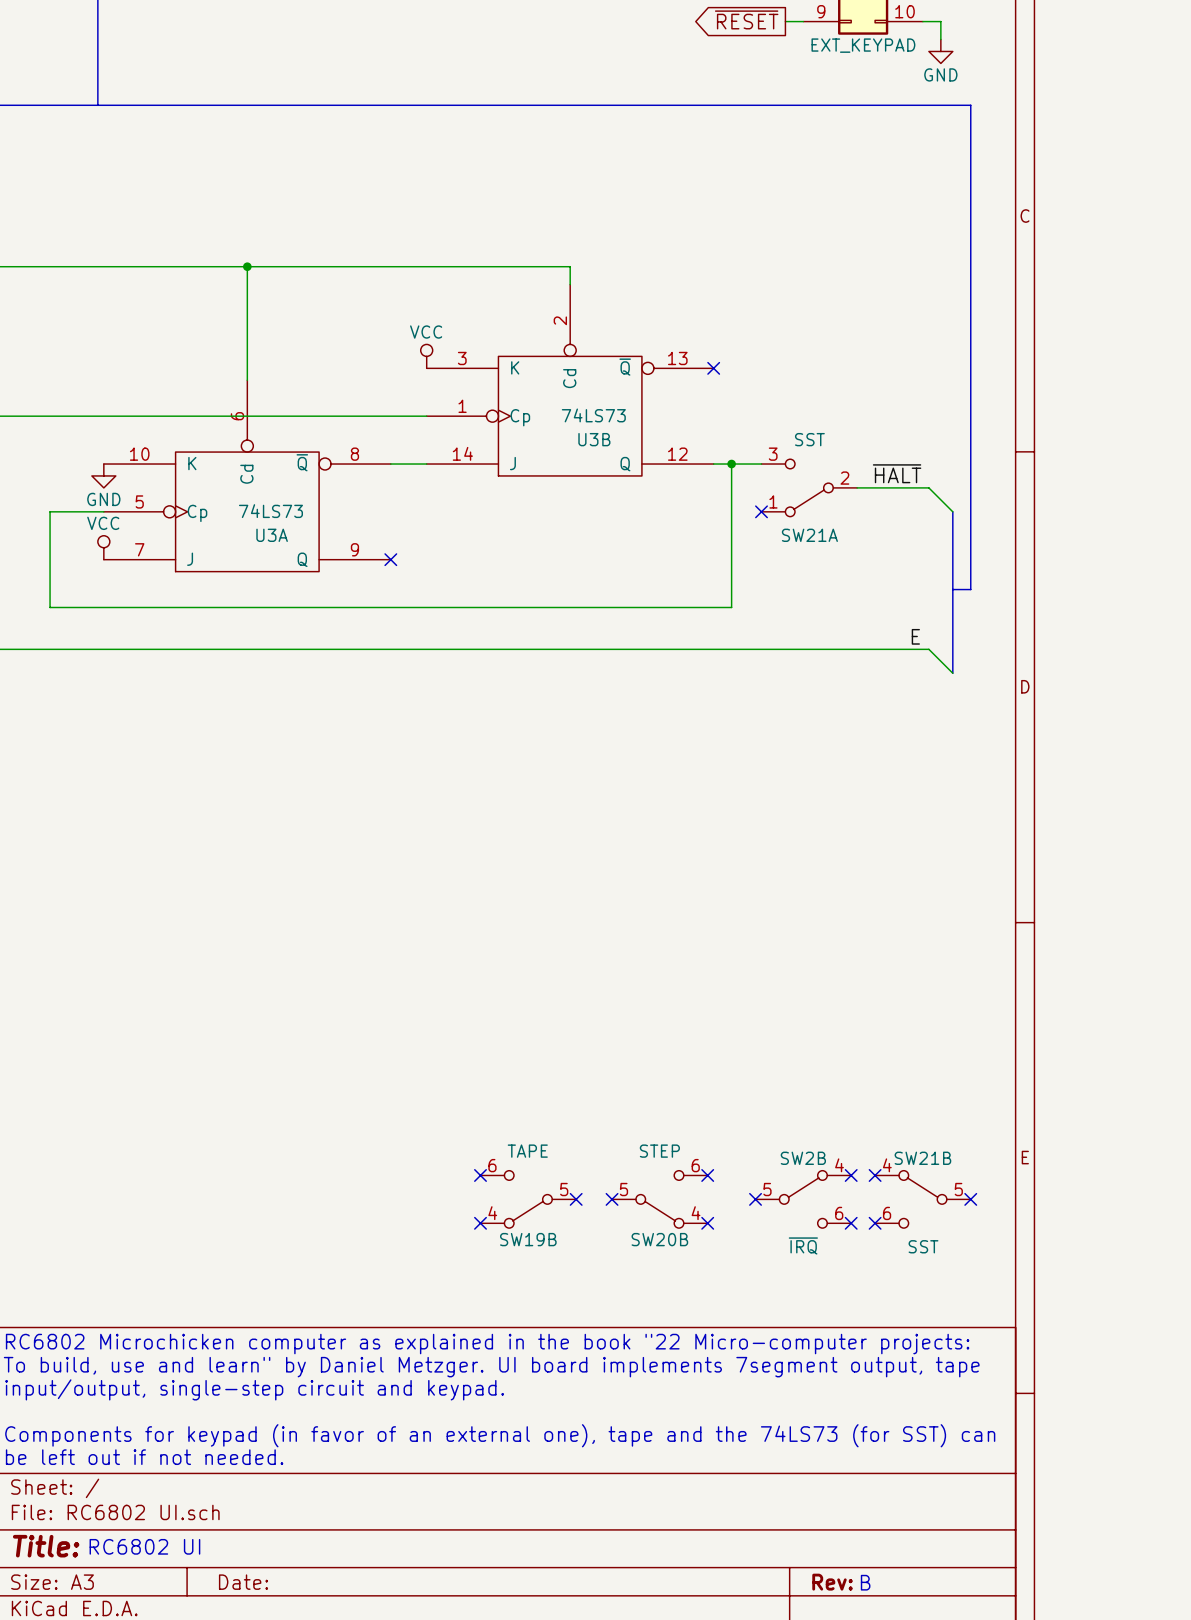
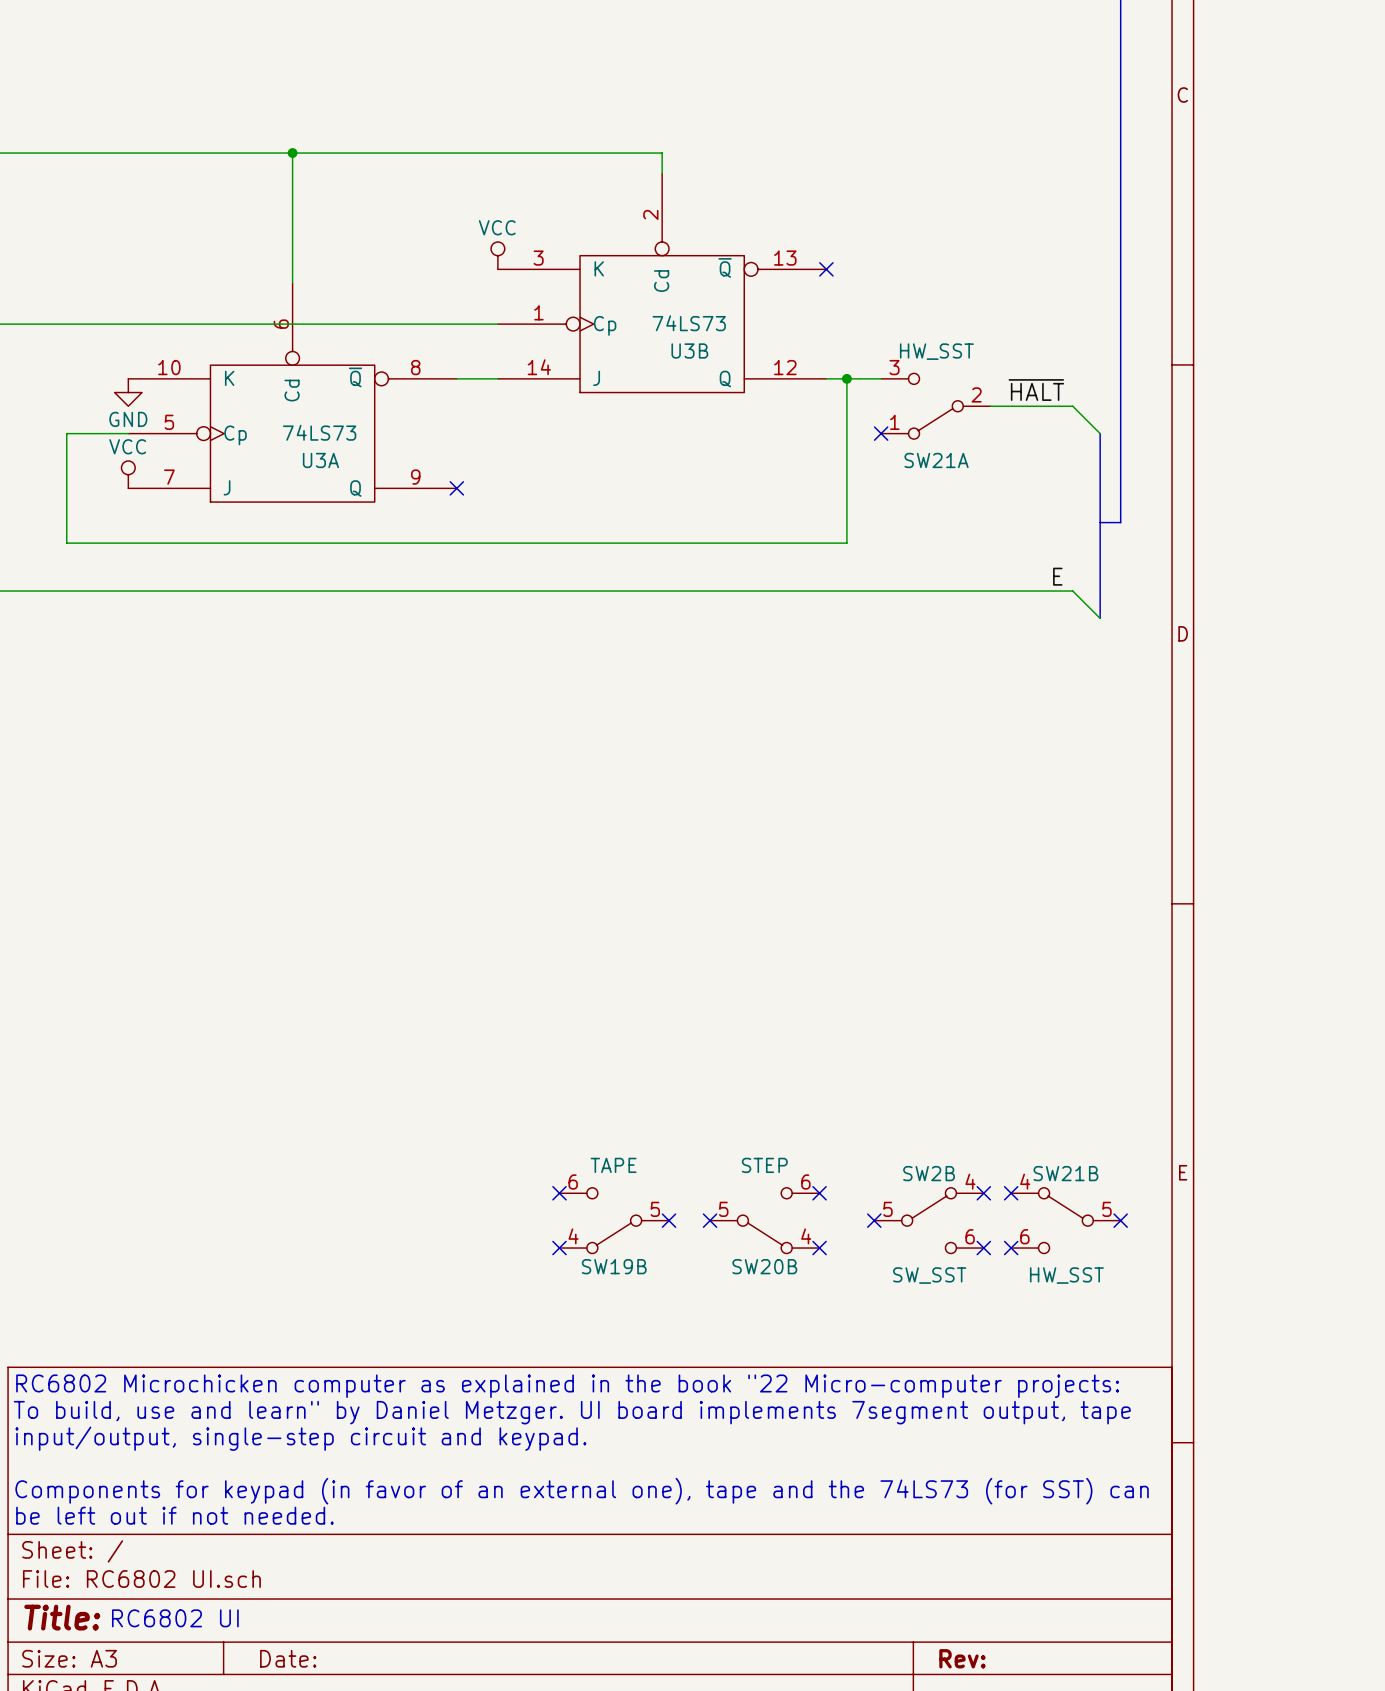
SW21A value: SST (809, 439) -> HW_SST (936, 351)
SW2B value: ~{IRQ} (803, 1245) -> SW_SST (929, 1275)
SW21B value: SST (923, 1246) -> HW_SST (1066, 1275)
text: B (865, 1582) -> none

